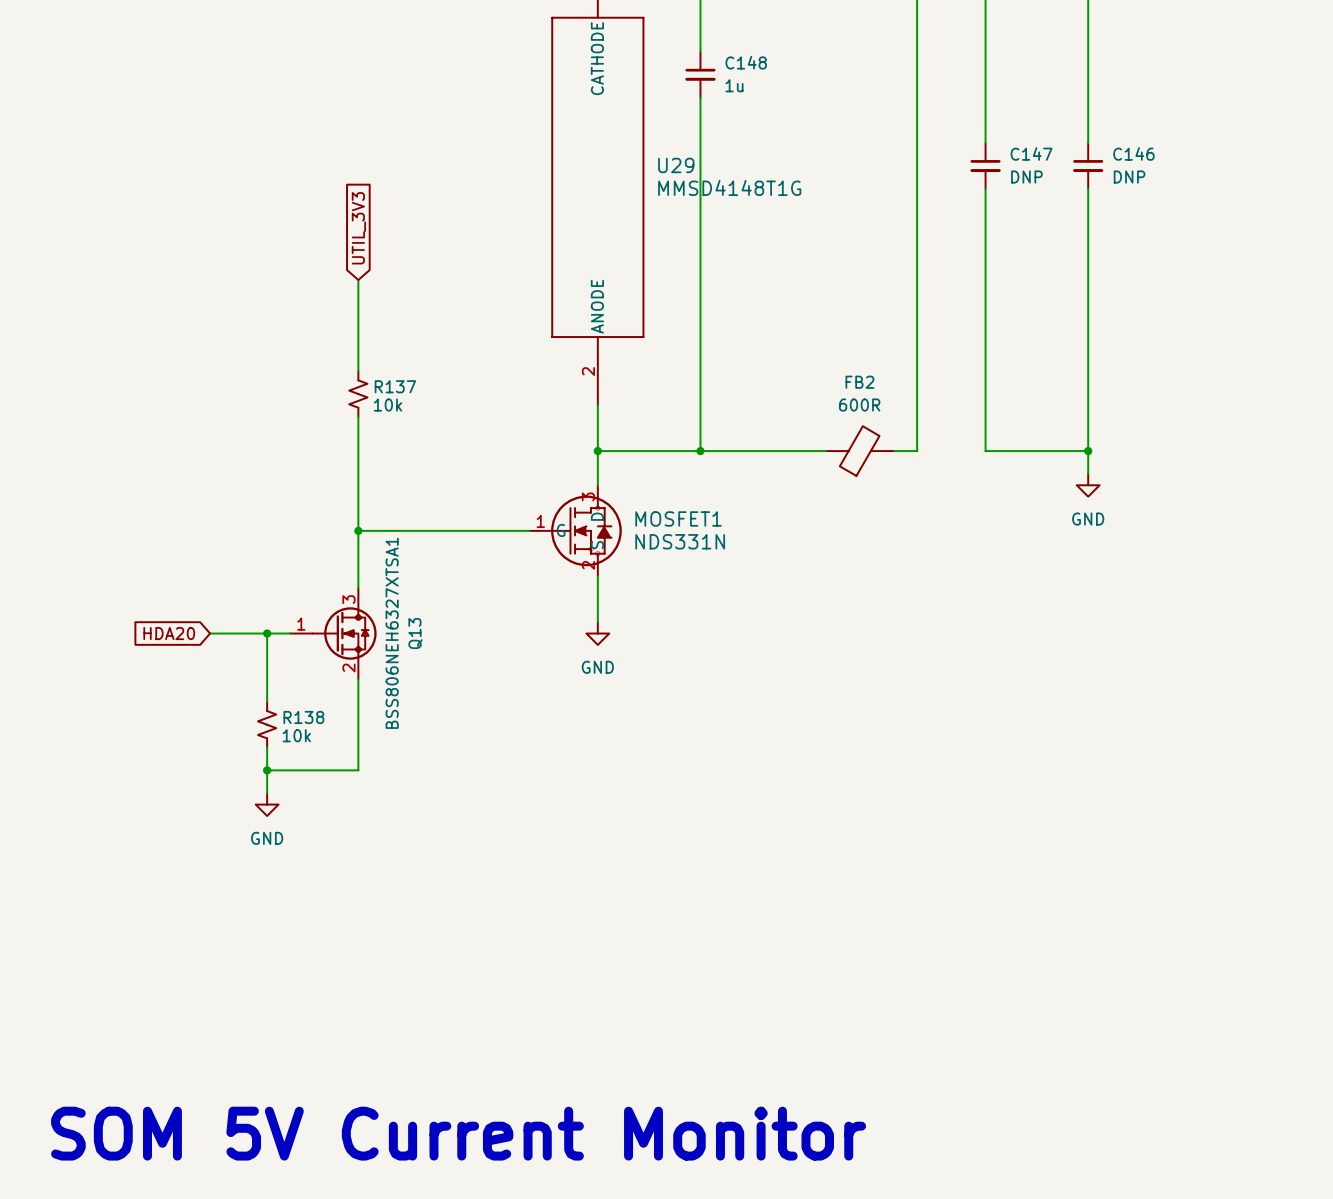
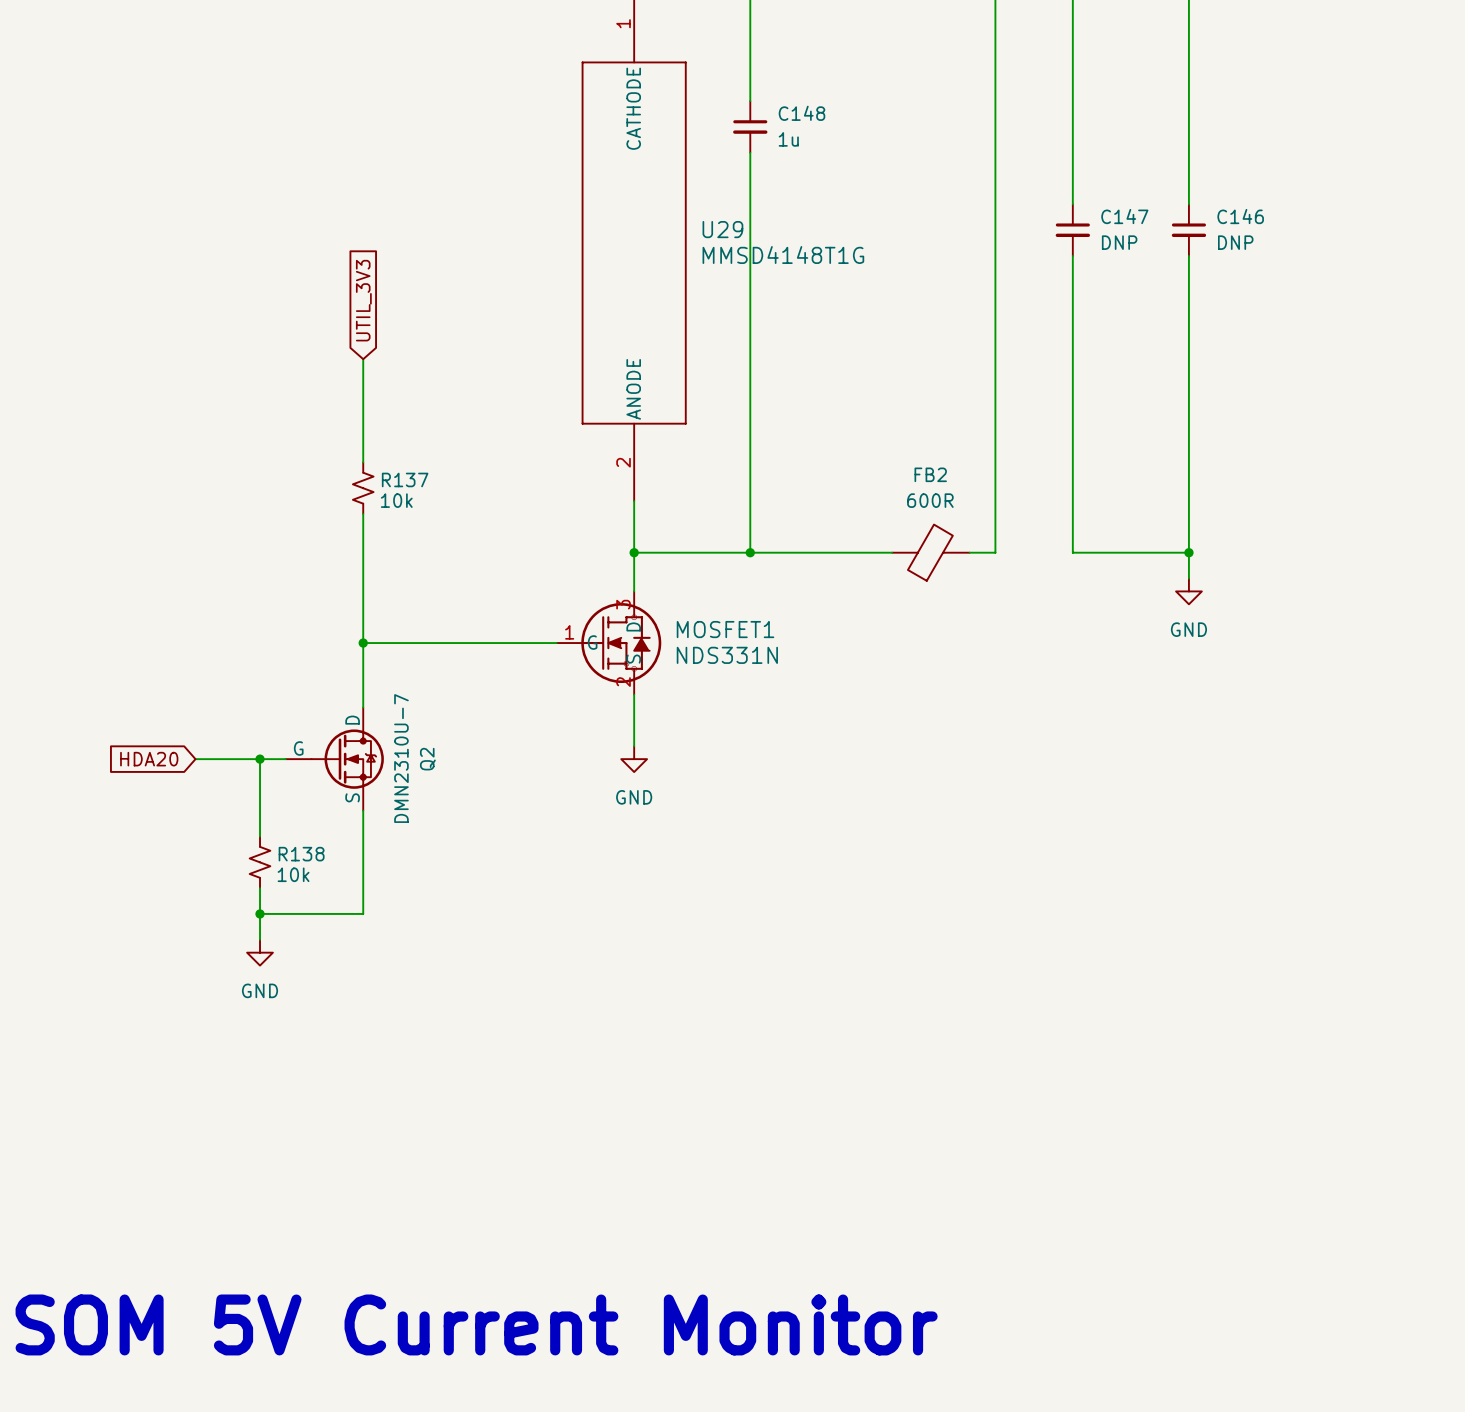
Q13: BSS806NEH6327XTSA1 (333, 633) -> none
Q2: none -> DMN2310U-7 (334, 759)

